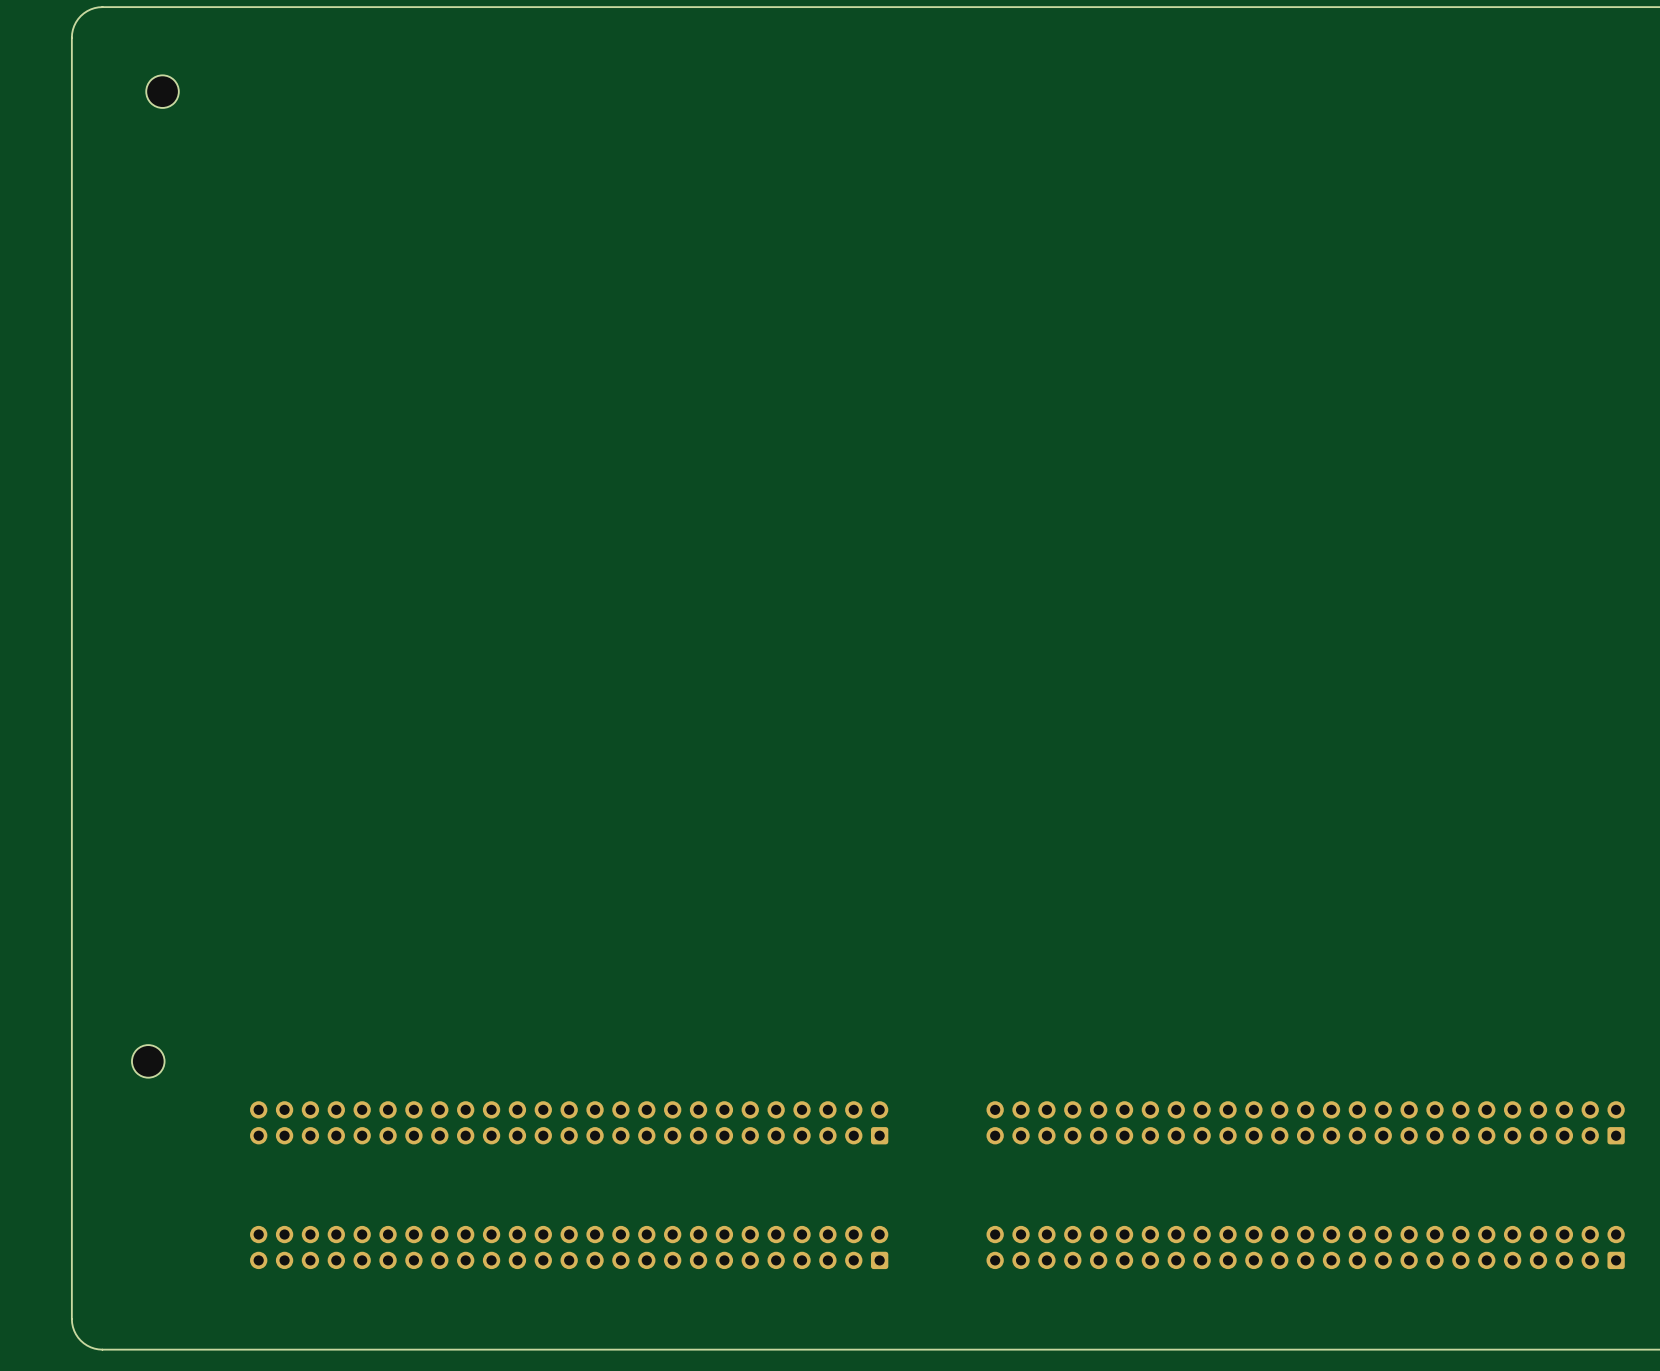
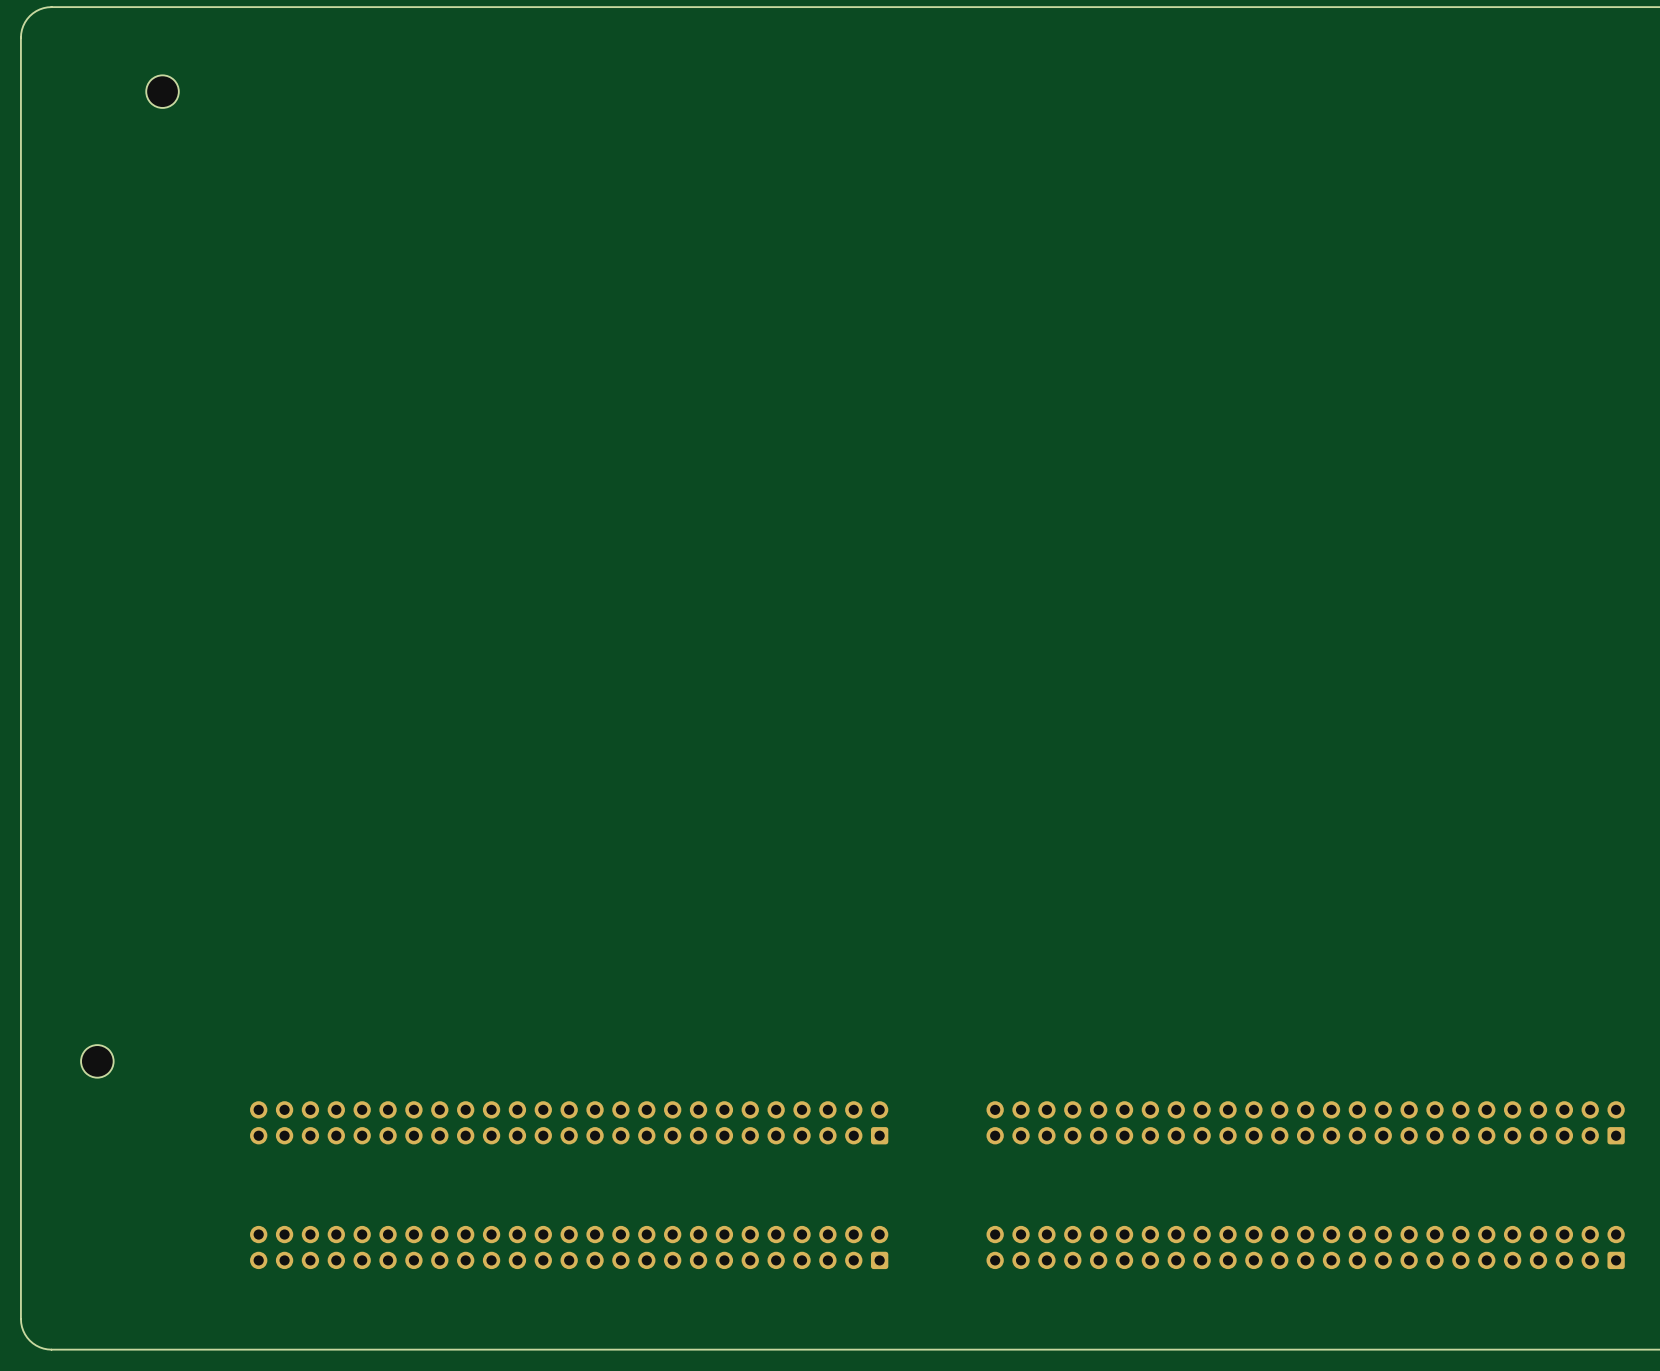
board edge: (102, 7) (90, 9) (80, 16) (74, 25) (71, 37) (71, 1319) (74, 1330) (80, 1340) (90, 1347) (102, 1349) -> (102, 7) (51, 7) (39, 9) (27, 19) (21, 29) (20, 37) (20, 1319) (21, 1327) (27, 1337) (39, 1347) (51, 1349) (102, 1349)
part position: (148, 1061) -> (97, 1061)

